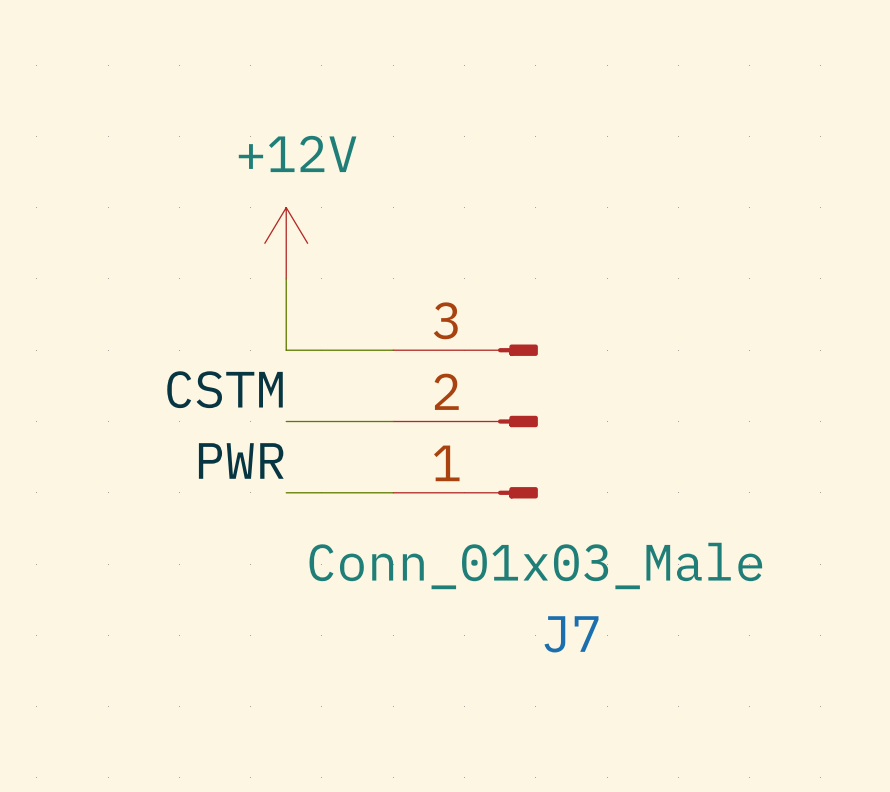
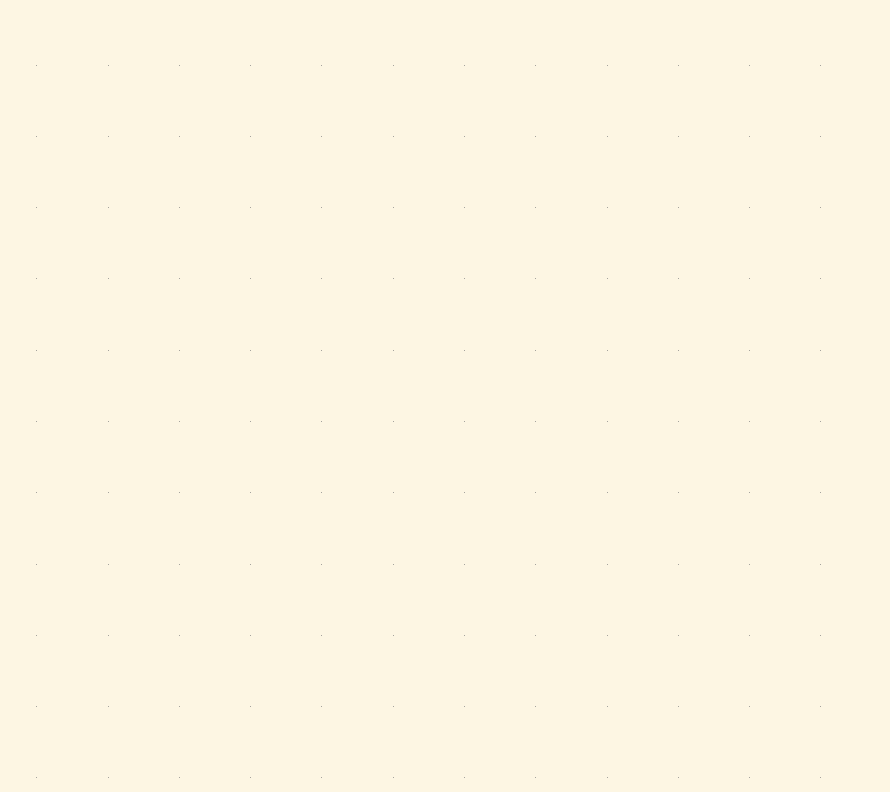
power symbol: +12V (286, 243) -> none
wire: (286, 278) (286, 350) (393, 350) -> none
label: CSTM (225, 389) -> none
wire: (286, 421) (393, 421) -> none
J7: Conn_01x03_Male (465, 421) -> none
label: PWR (241, 460) -> none
wire: (286, 492) (393, 492) -> none

